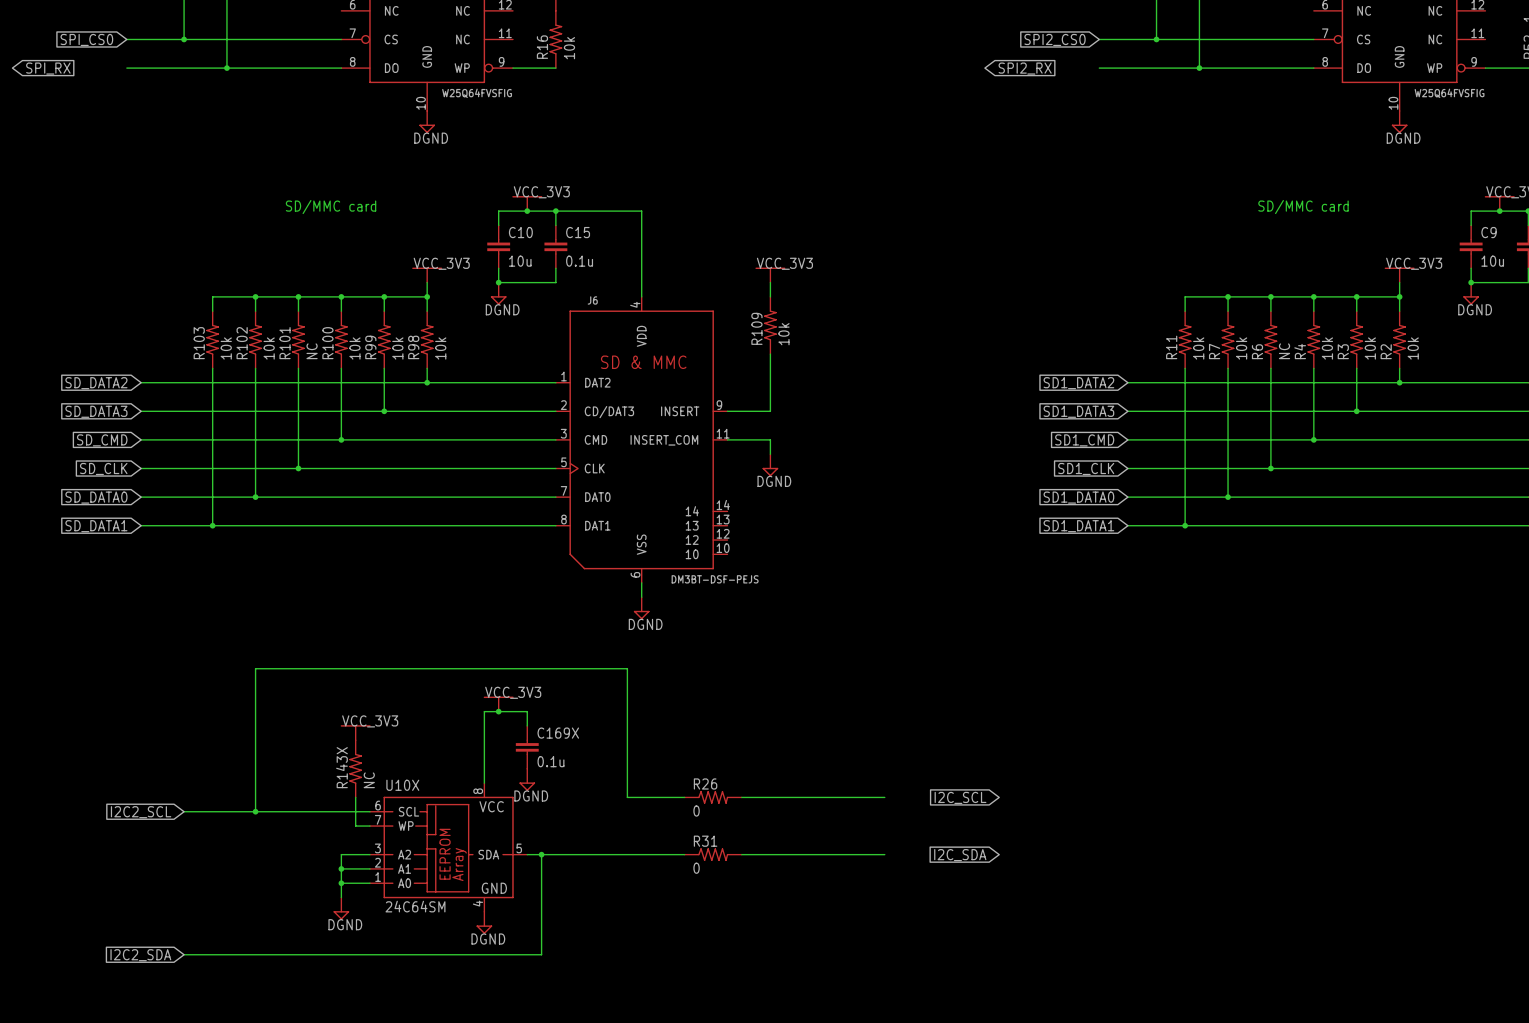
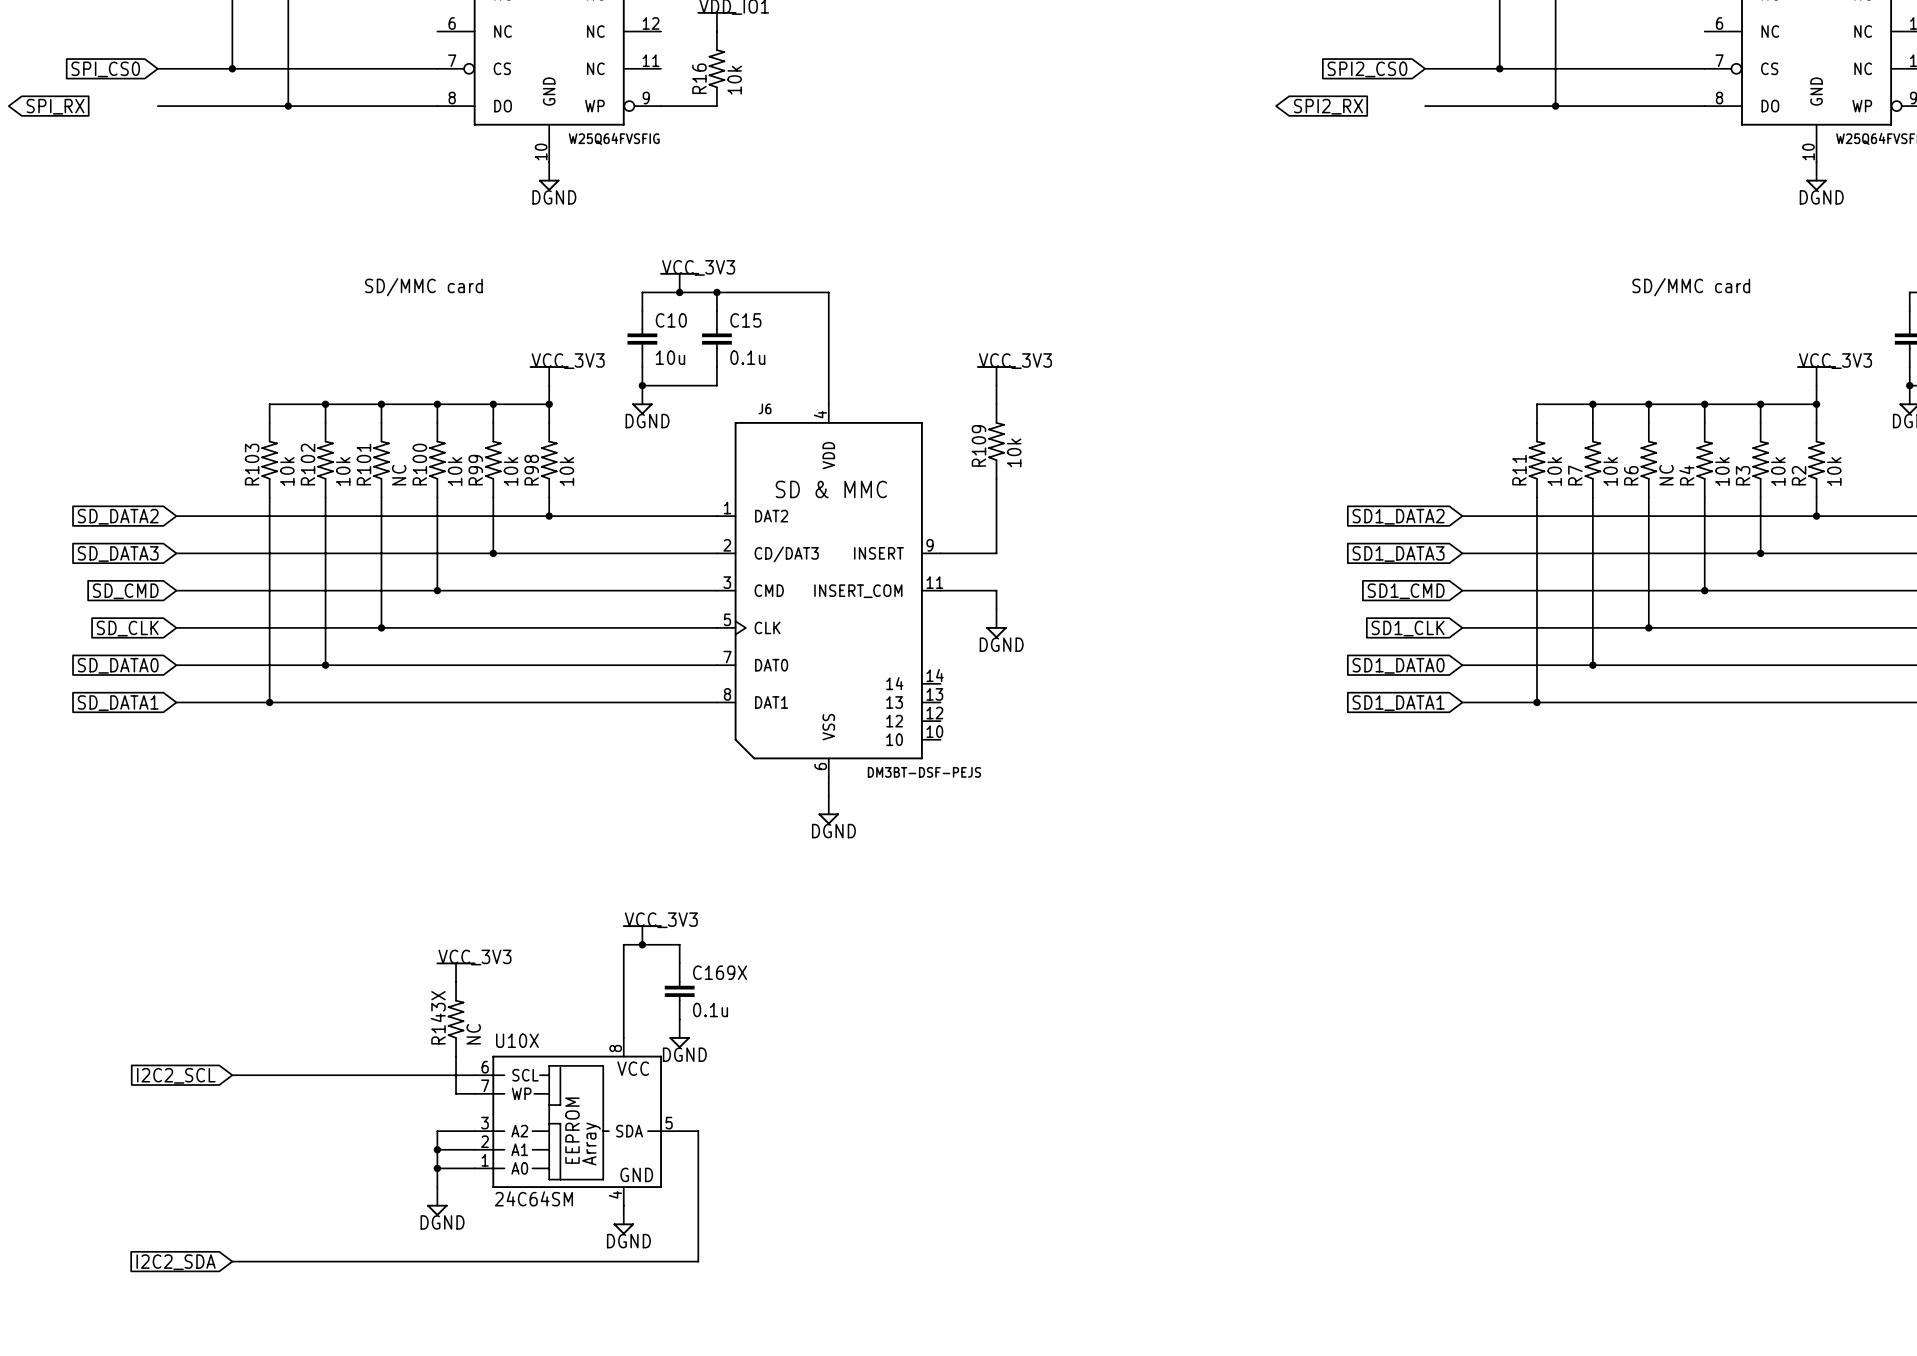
wire: (684, 797) (627, 797) (627, 668) (255, 668) (255, 811) -> none
R26: 0 (713, 797) -> none
wire: (741, 797) (884, 797) -> none
global label: I2C_SCL (960, 797) -> none
junction: (255, 811) -> none
wire: (541, 854) (684, 854) -> none
junction: (541, 854) -> none
R31: 0 (713, 854) -> none
wire: (741, 854) (884, 854) -> none
global label: I2C_SDA (960, 855) -> none

